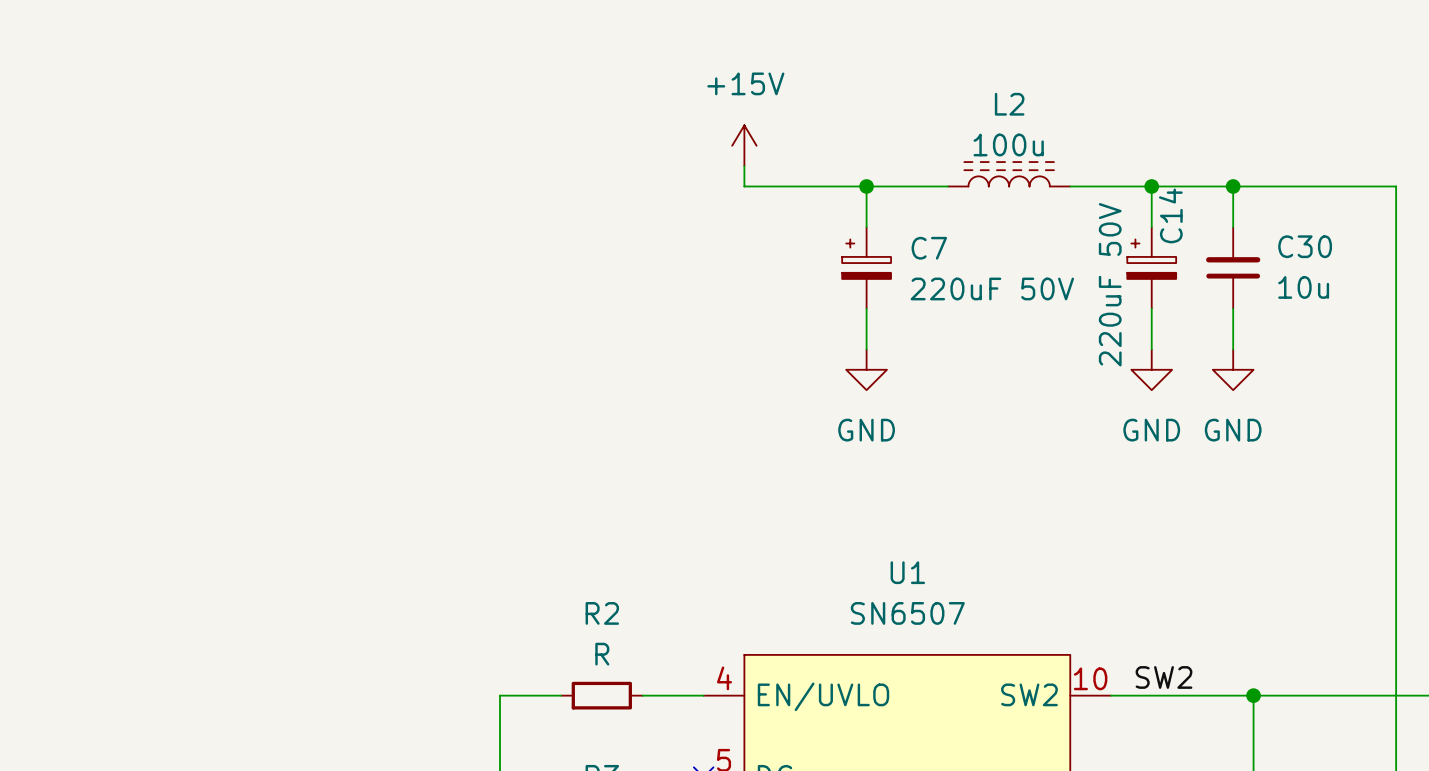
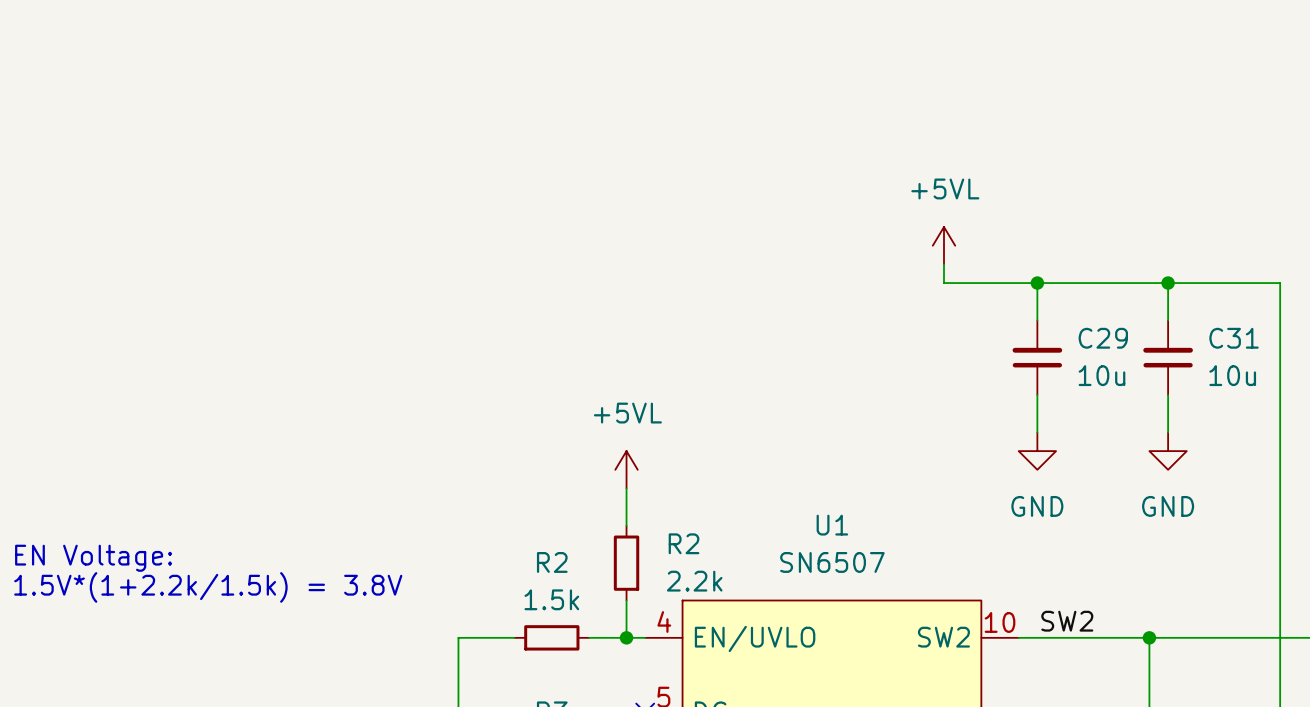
power symbol: +15V (744, 145) -> none
wire: (744, 166) (744, 186) (948, 186) -> none
L2: 100u (1009, 174) -> none
wire: (866, 186) (866, 227) -> (626, 488) (626, 525)
junction: (866, 186) -> none
wire: (1070, 186) (1396, 186) (1396, 308) -> (944, 264) (944, 283) (1280, 283)
wire: (1151, 186) (1151, 227) -> (1037, 283) (1037, 320)
junction: (1151, 186) -> none
wire: (1233, 186) (1233, 227) -> (1168, 283) (1168, 320)
junction: (1233, 186) -> none
C7: 220uF 50V (866, 267) -> none
power symbol: none -> +5VL (944, 245)
C14: 220uF 50V (1151, 267) -> none
C30: 10u (1233, 267) -> none
wire: (866, 308) (866, 349) -> (626, 600) (626, 637)
junction: none -> (1037, 283)
wire: (1151, 308) (1151, 349) -> (1037, 395) (1037, 432)
wire: (1233, 308) (1233, 349) -> (1168, 395) (1168, 432)
junction: none -> (1168, 283)
power symbol: GND (866, 369) -> none
power symbol: GND (1151, 369) -> none
power symbol: GND (1233, 369) -> none
C29: none -> 10u (1037, 357)
C31: none -> 10u (1168, 357)
power symbol: none -> GND (1037, 451)
power symbol: none -> GND (1168, 451)
power symbol: none -> +5VL (626, 469)
text: none -> EN Voltage: (93, 558)
R2: none -> 2.2k (626, 563)
text: none -> 1.5V*(1+2.2k/1.5k) = 3.8V (208, 587)
R2 value: R (602, 654) -> 1.5k (551, 599)
junction: none -> (626, 637)

